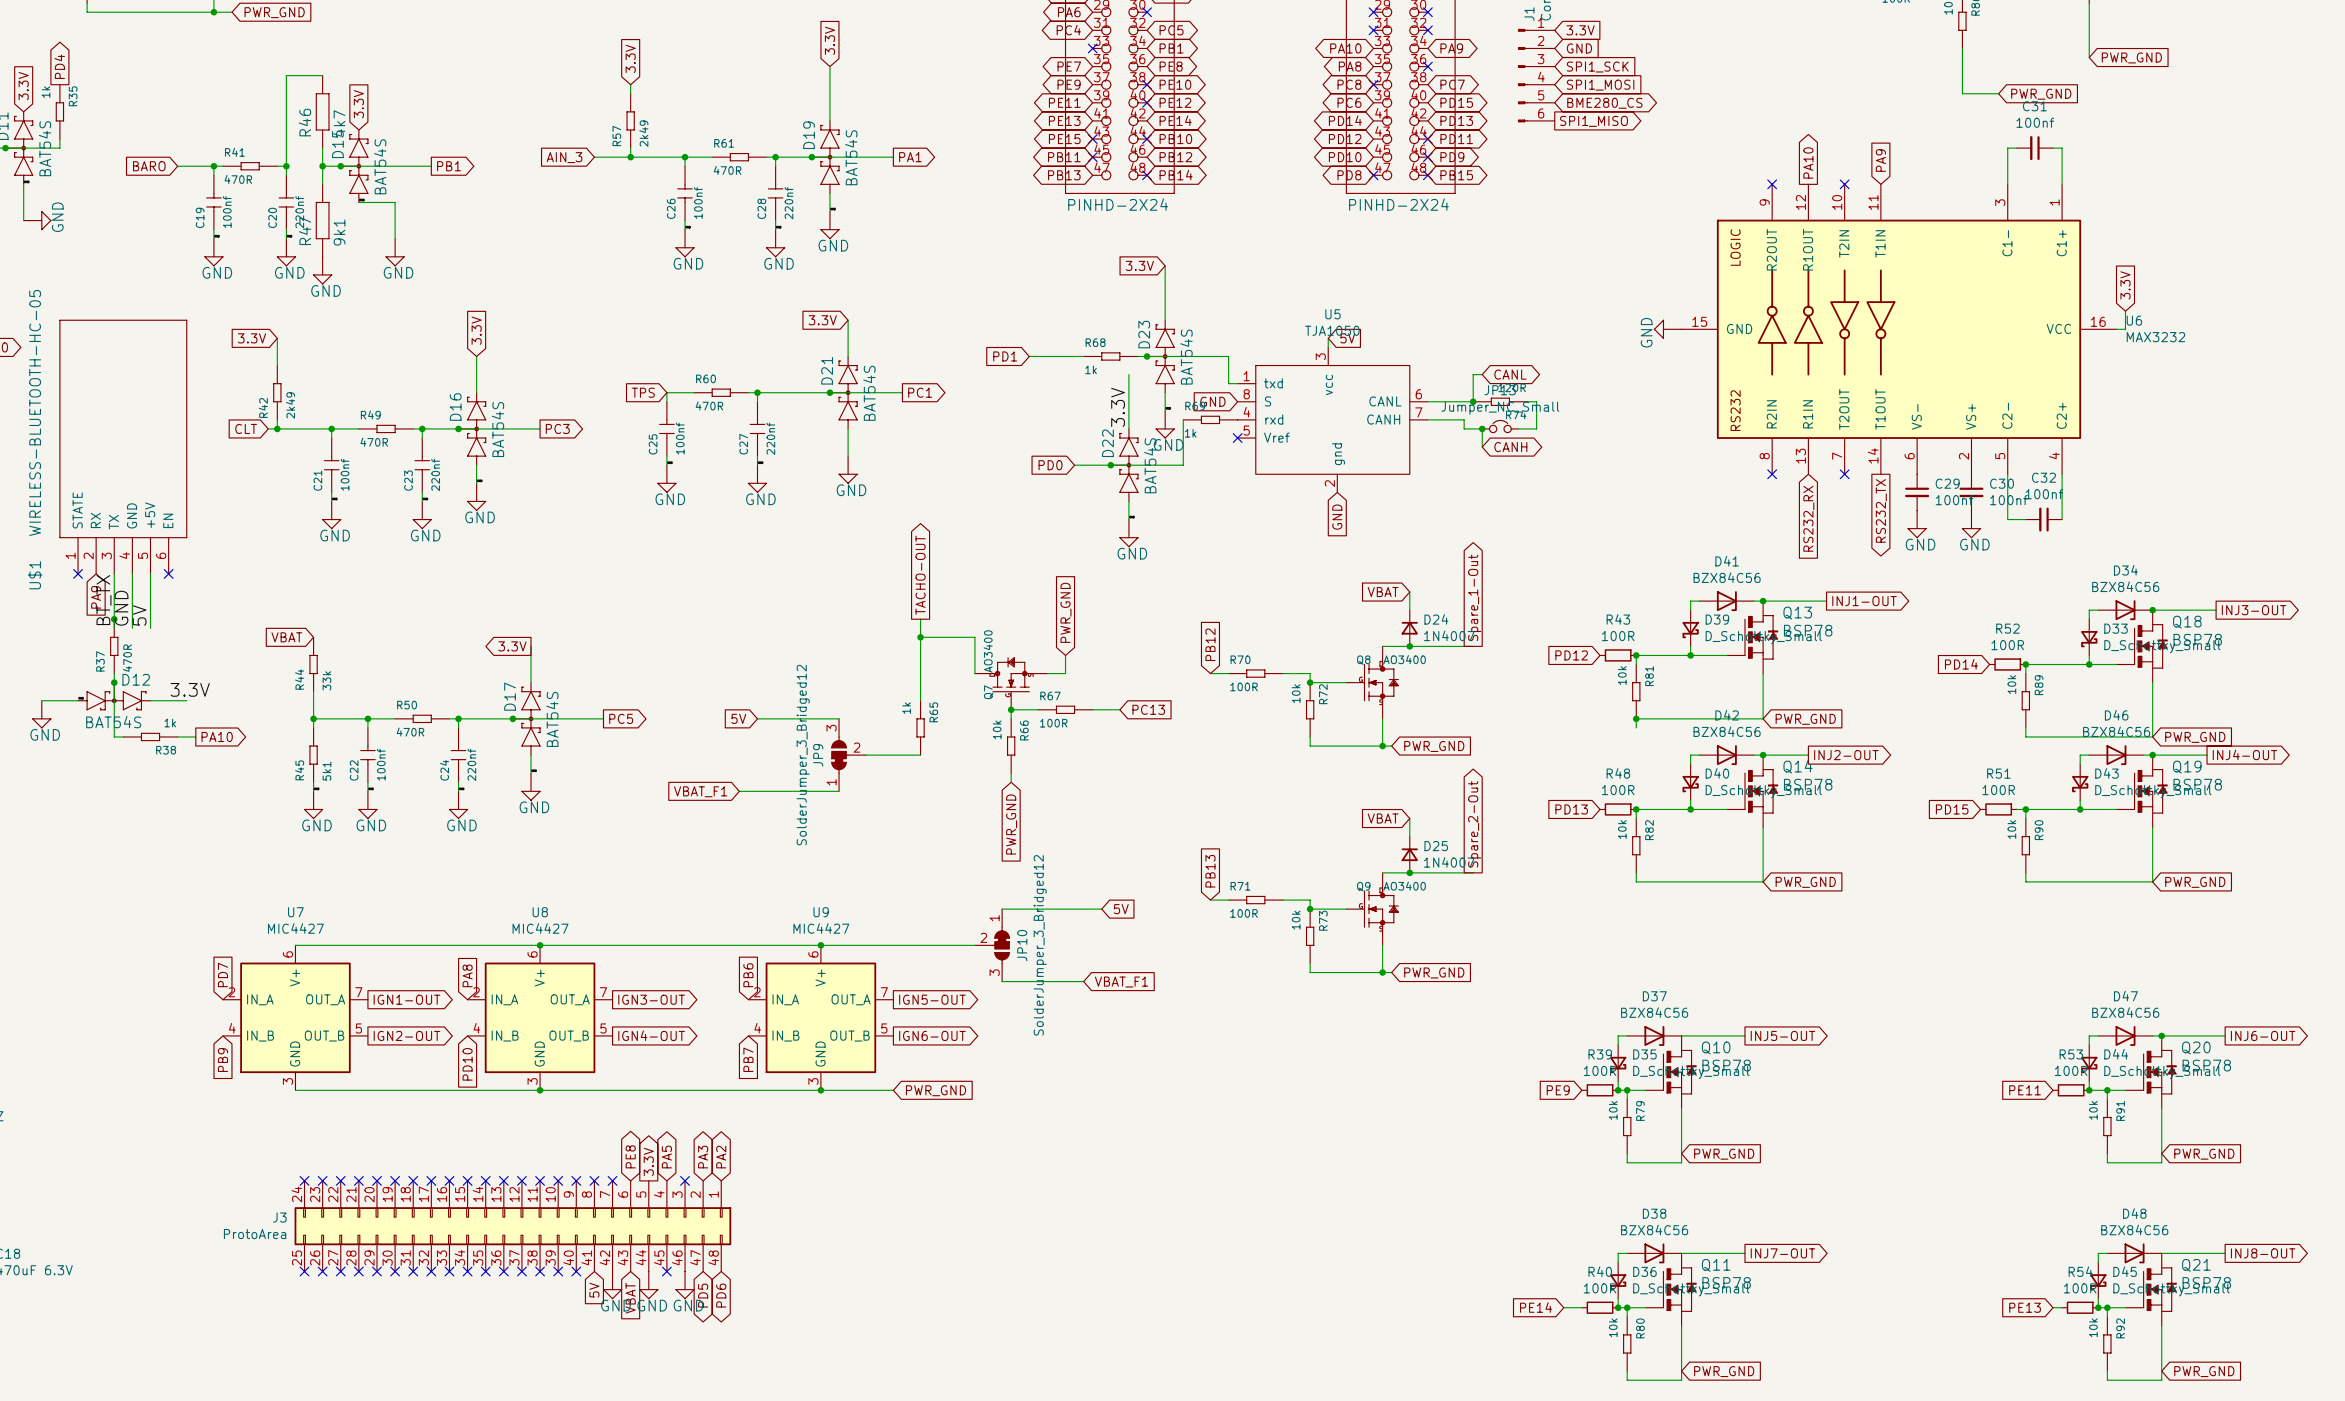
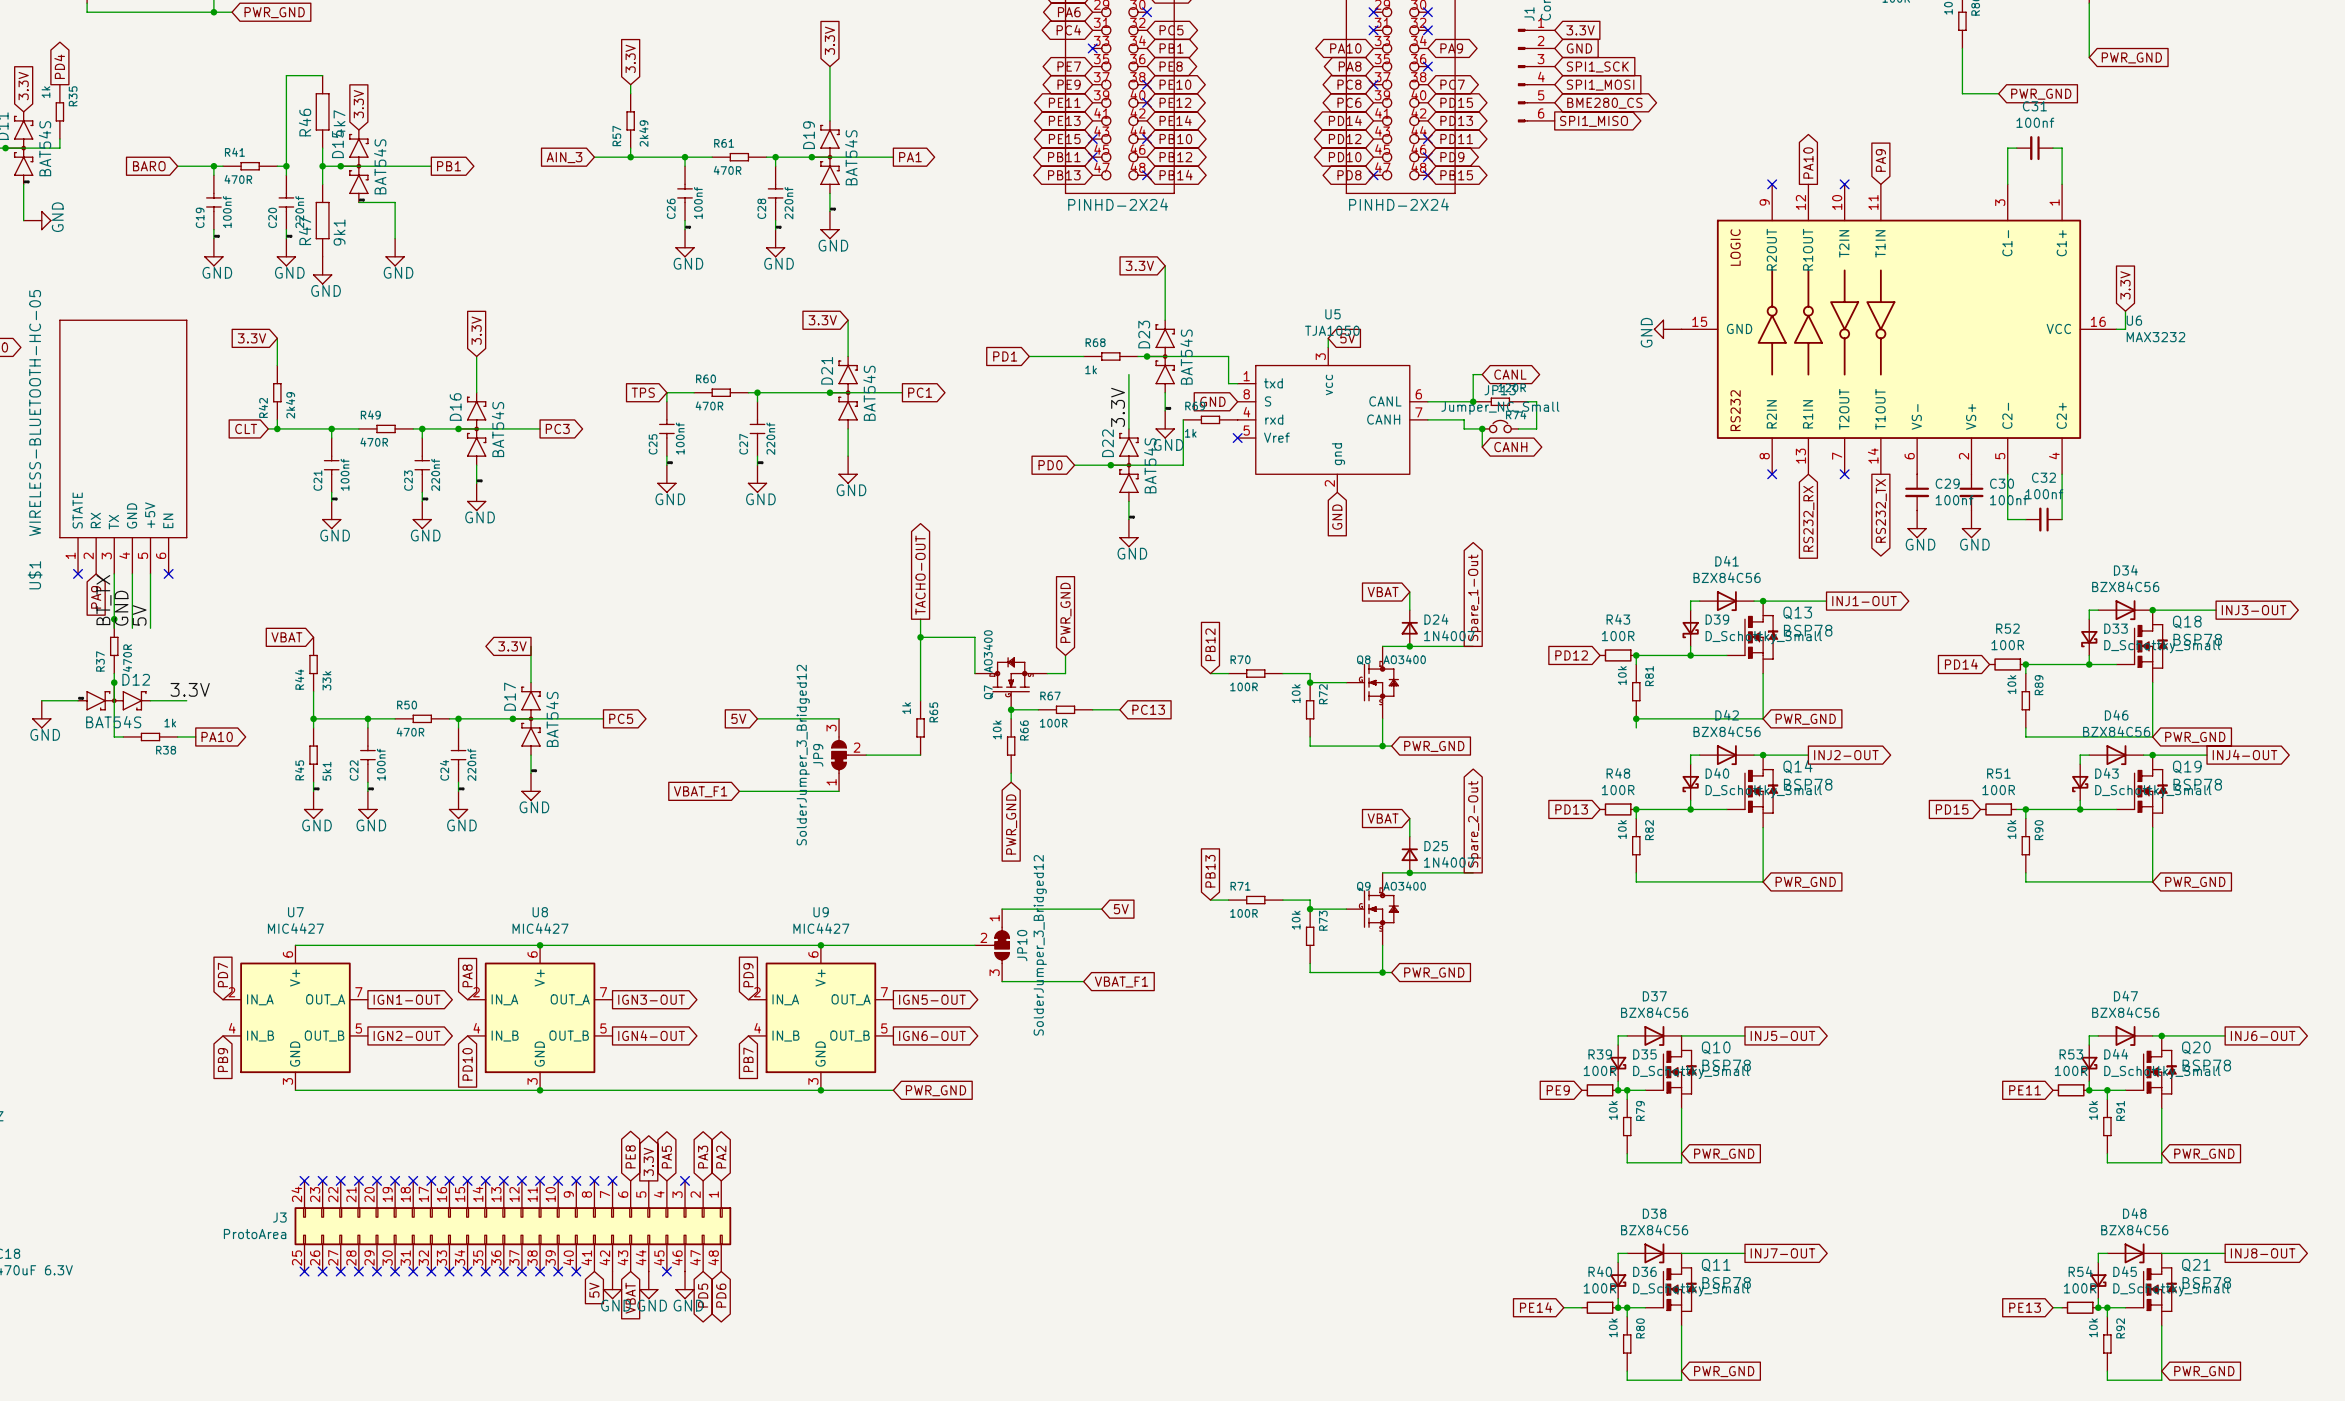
global label: PB6 (748, 975) -> PD9 (748, 975)

